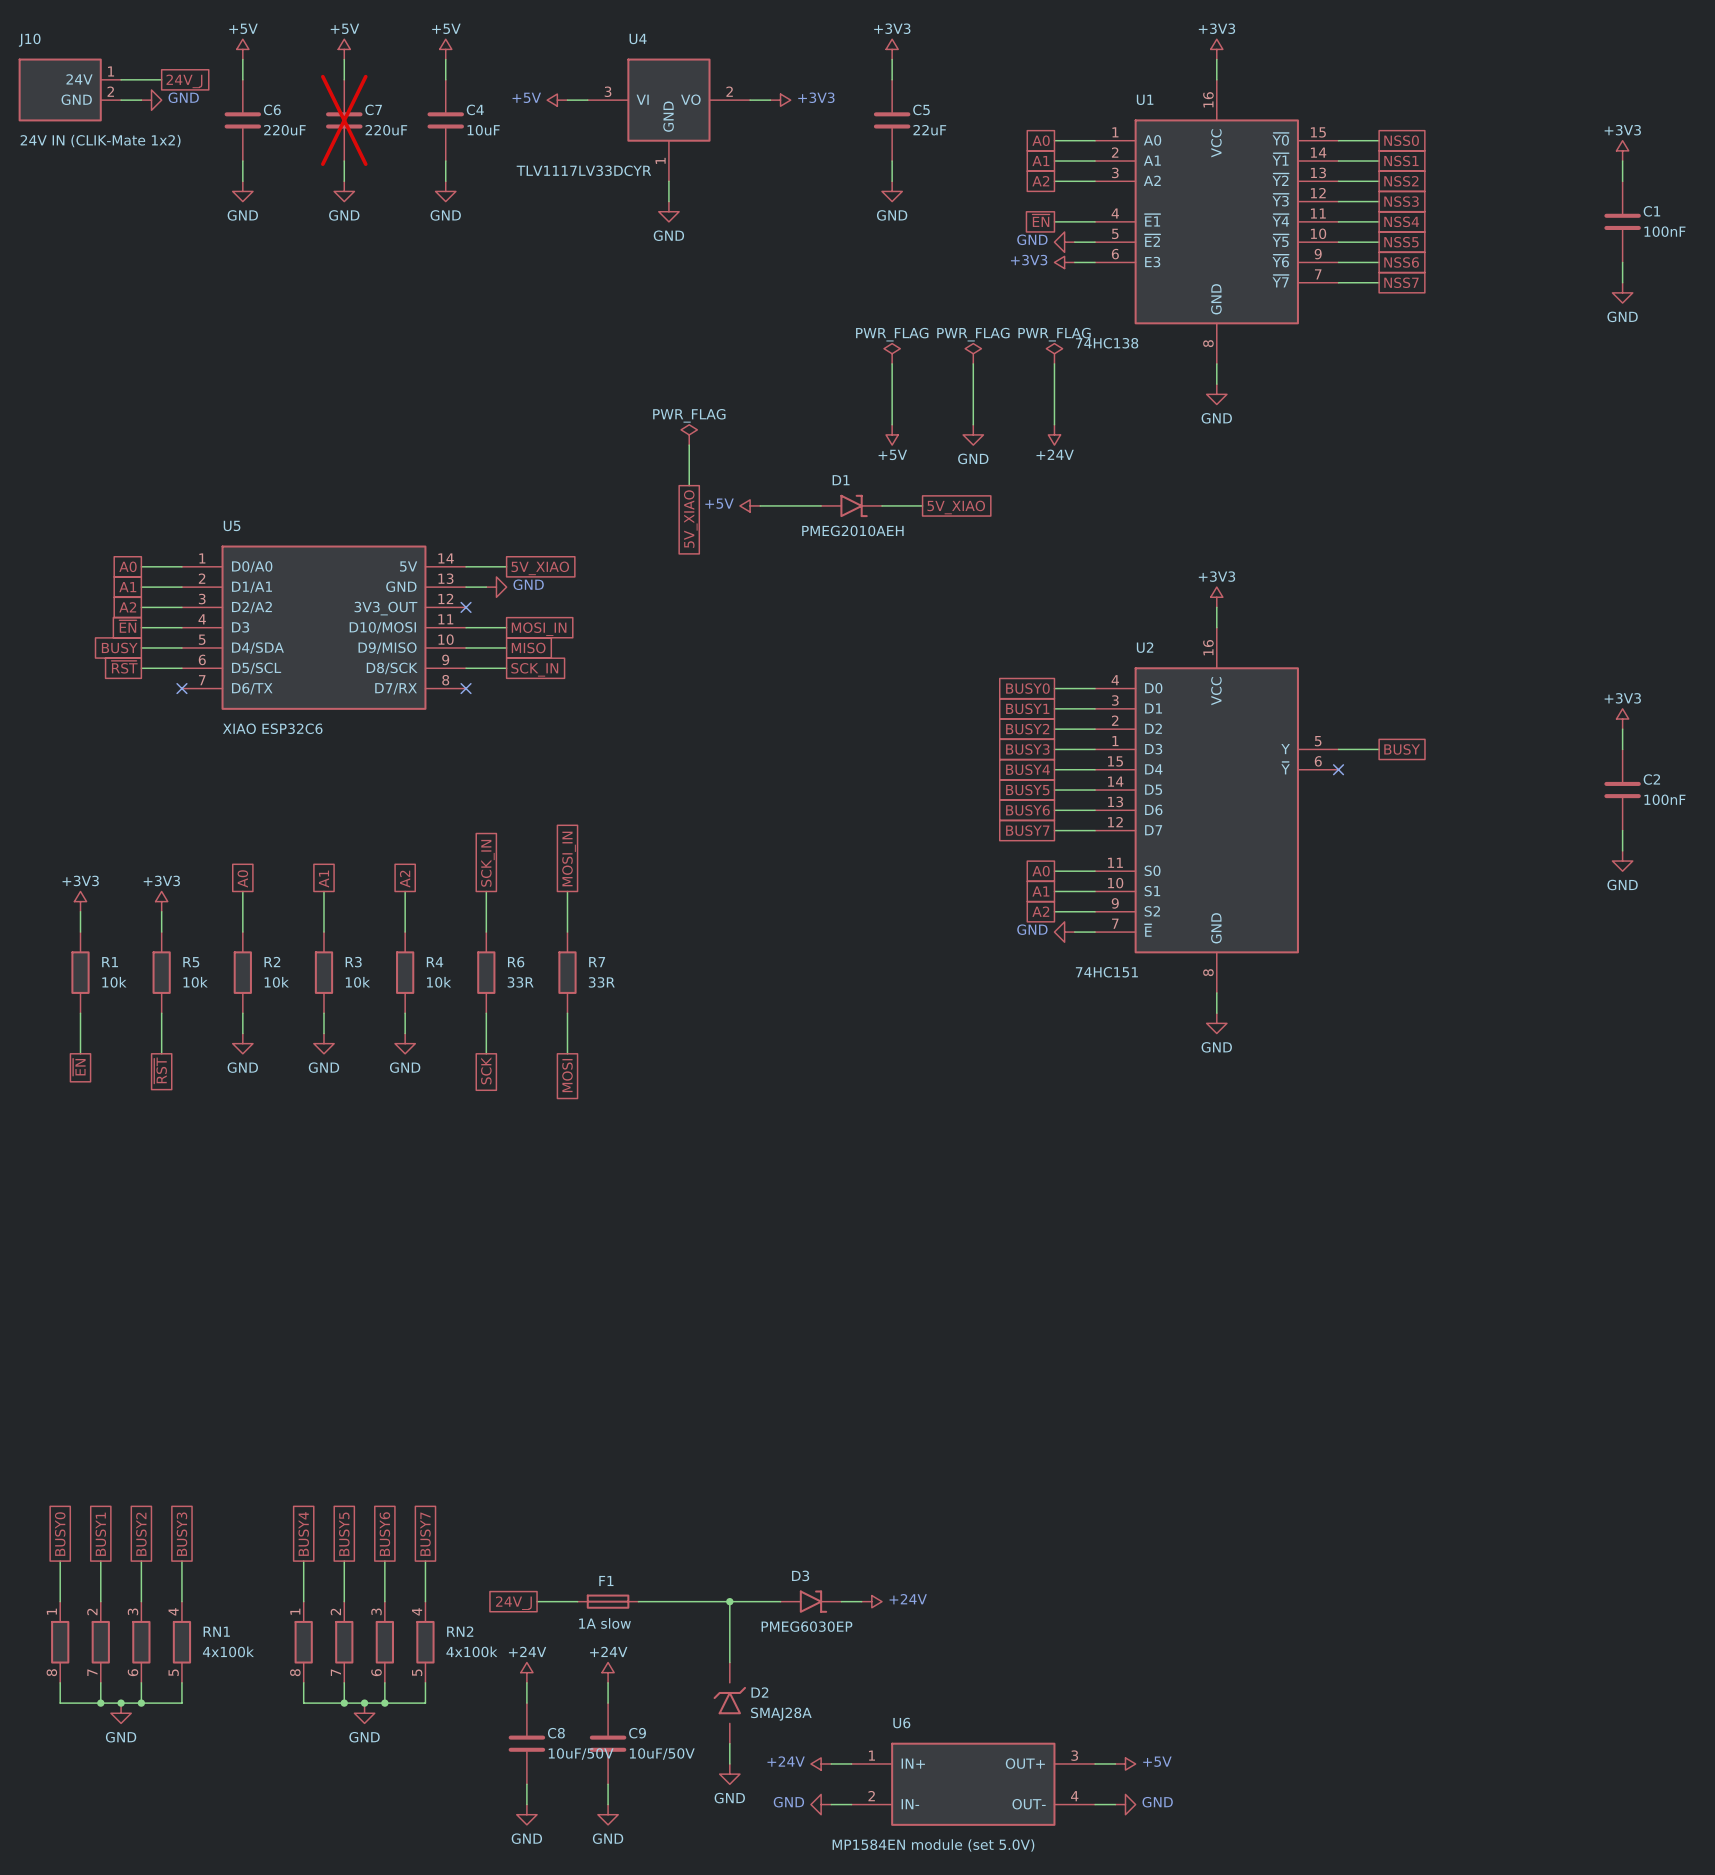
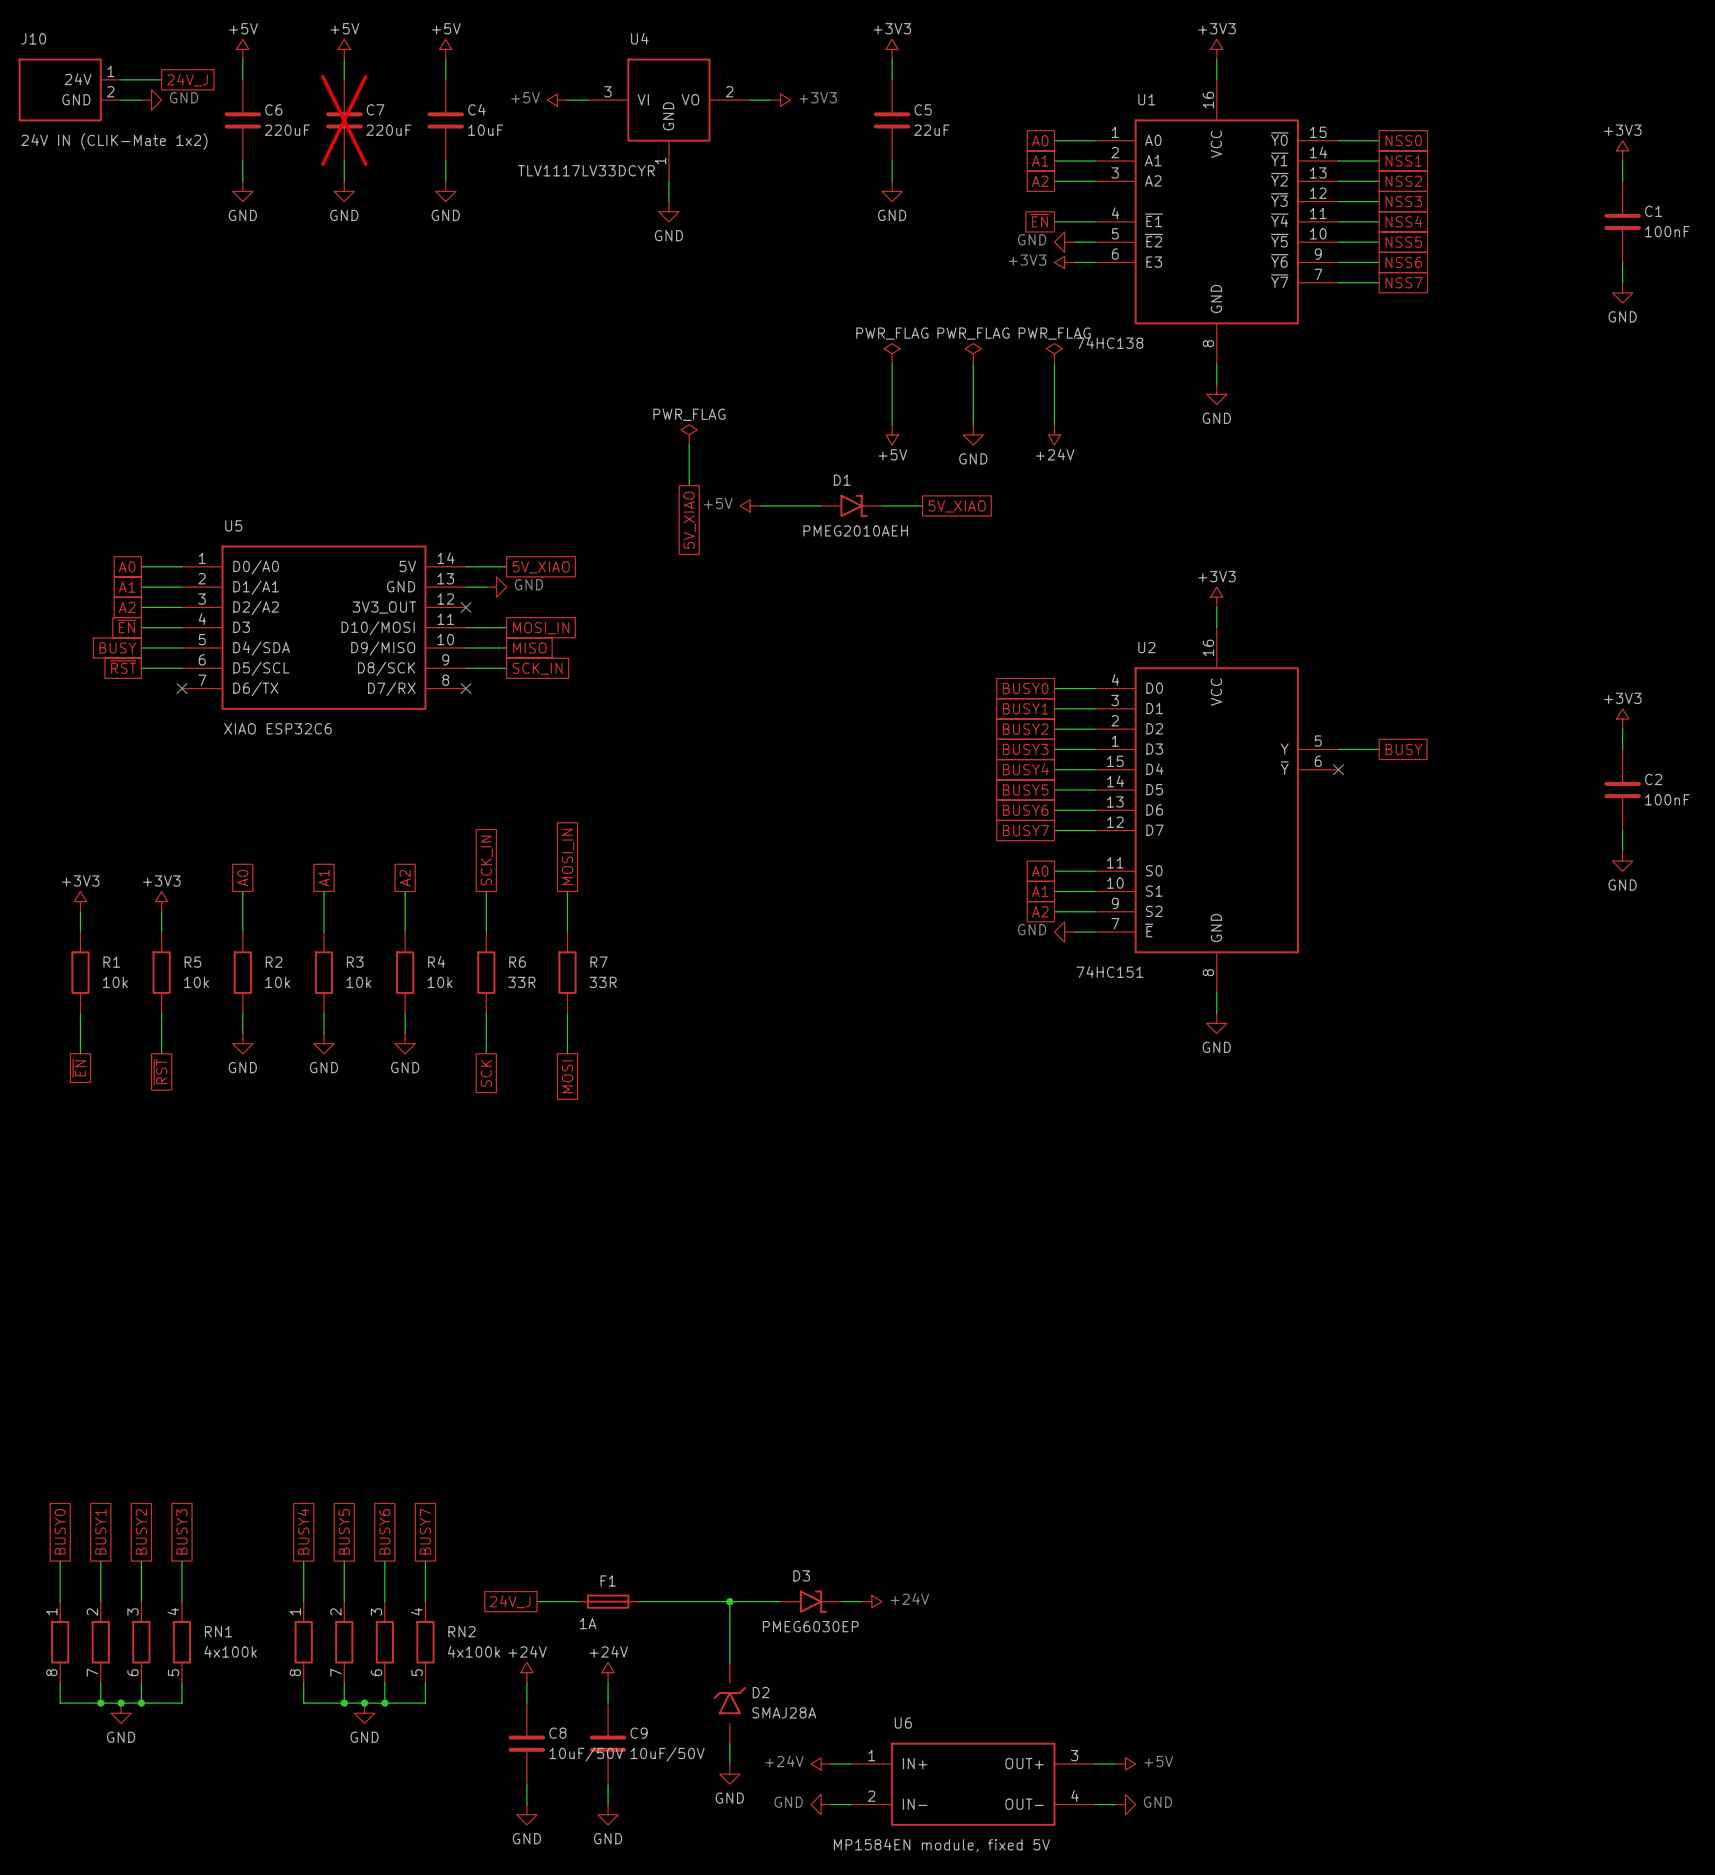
F1 value: 1A slow (605, 1623) -> 1A (588, 1623)
U6 value: MP1584EN module (set 5.0V) (933, 1845) -> MP1584EN module, fixed 5V (941, 1845)

